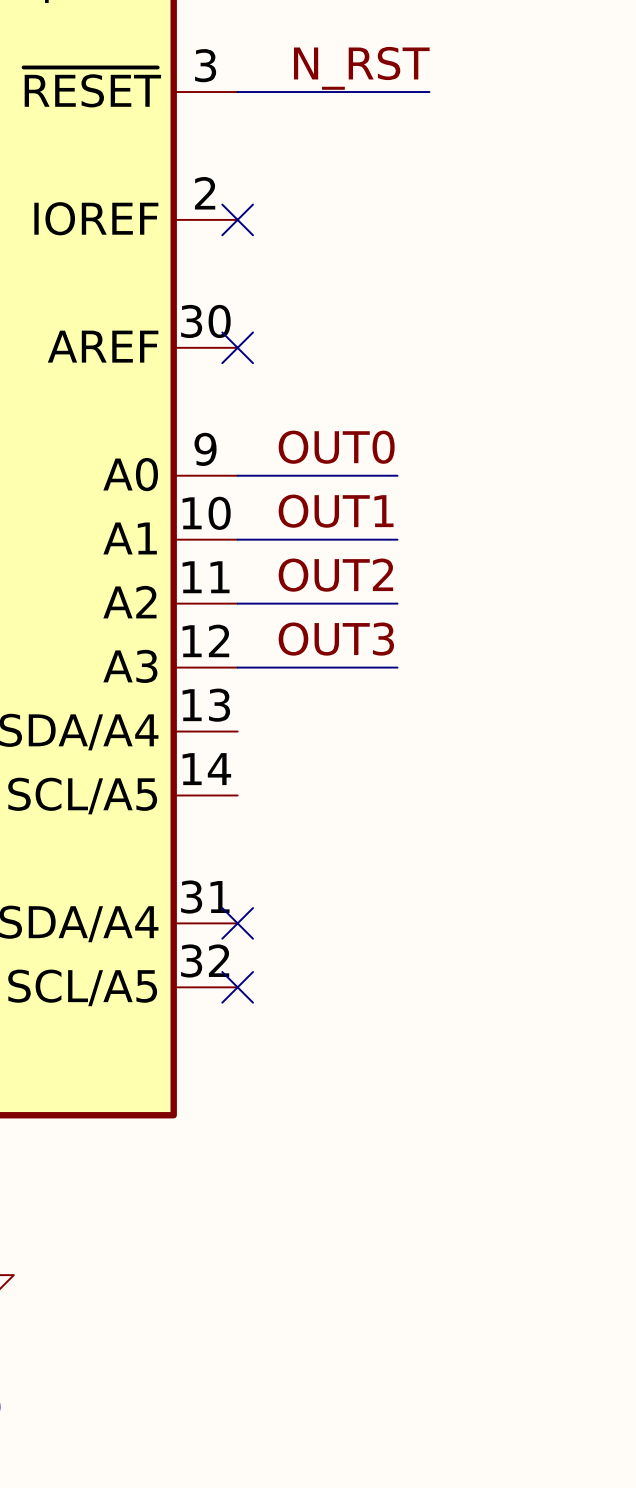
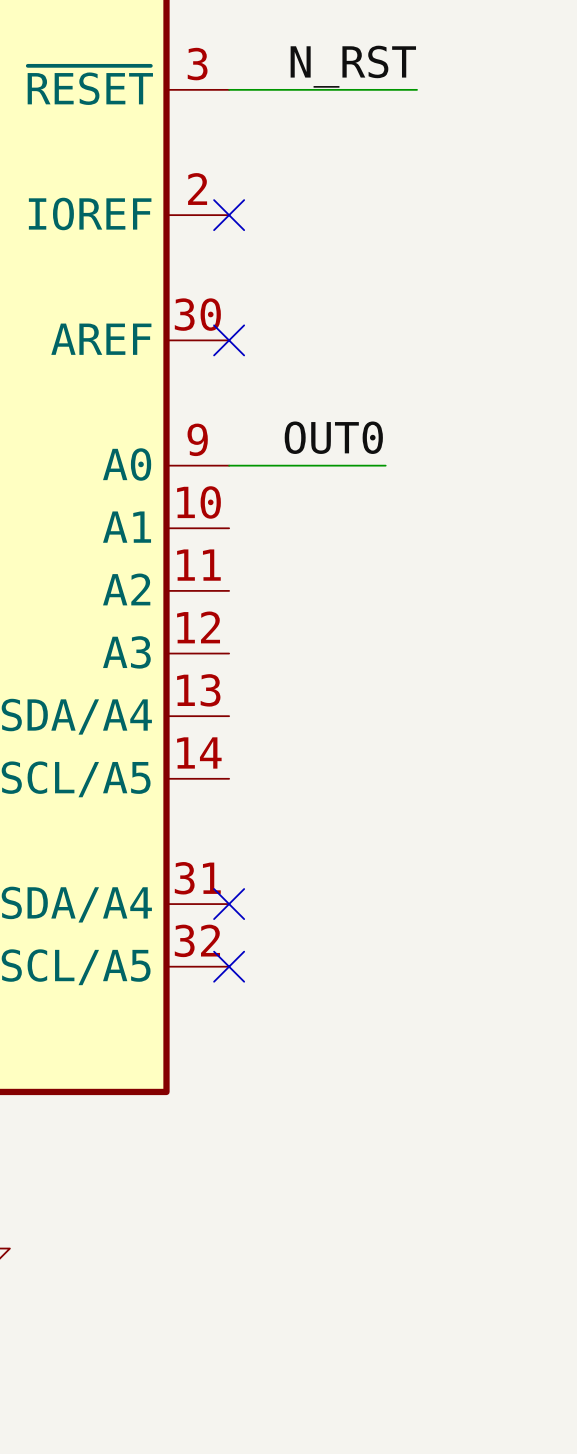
label: OUT1 (336, 511) -> none
wire: (237, 539) (397, 539) -> none
label: OUT2 (335, 575) -> none
wire: (237, 603) (397, 603) -> none
label: OUT3 (336, 639) -> none
wire: (237, 667) (397, 667) -> none

